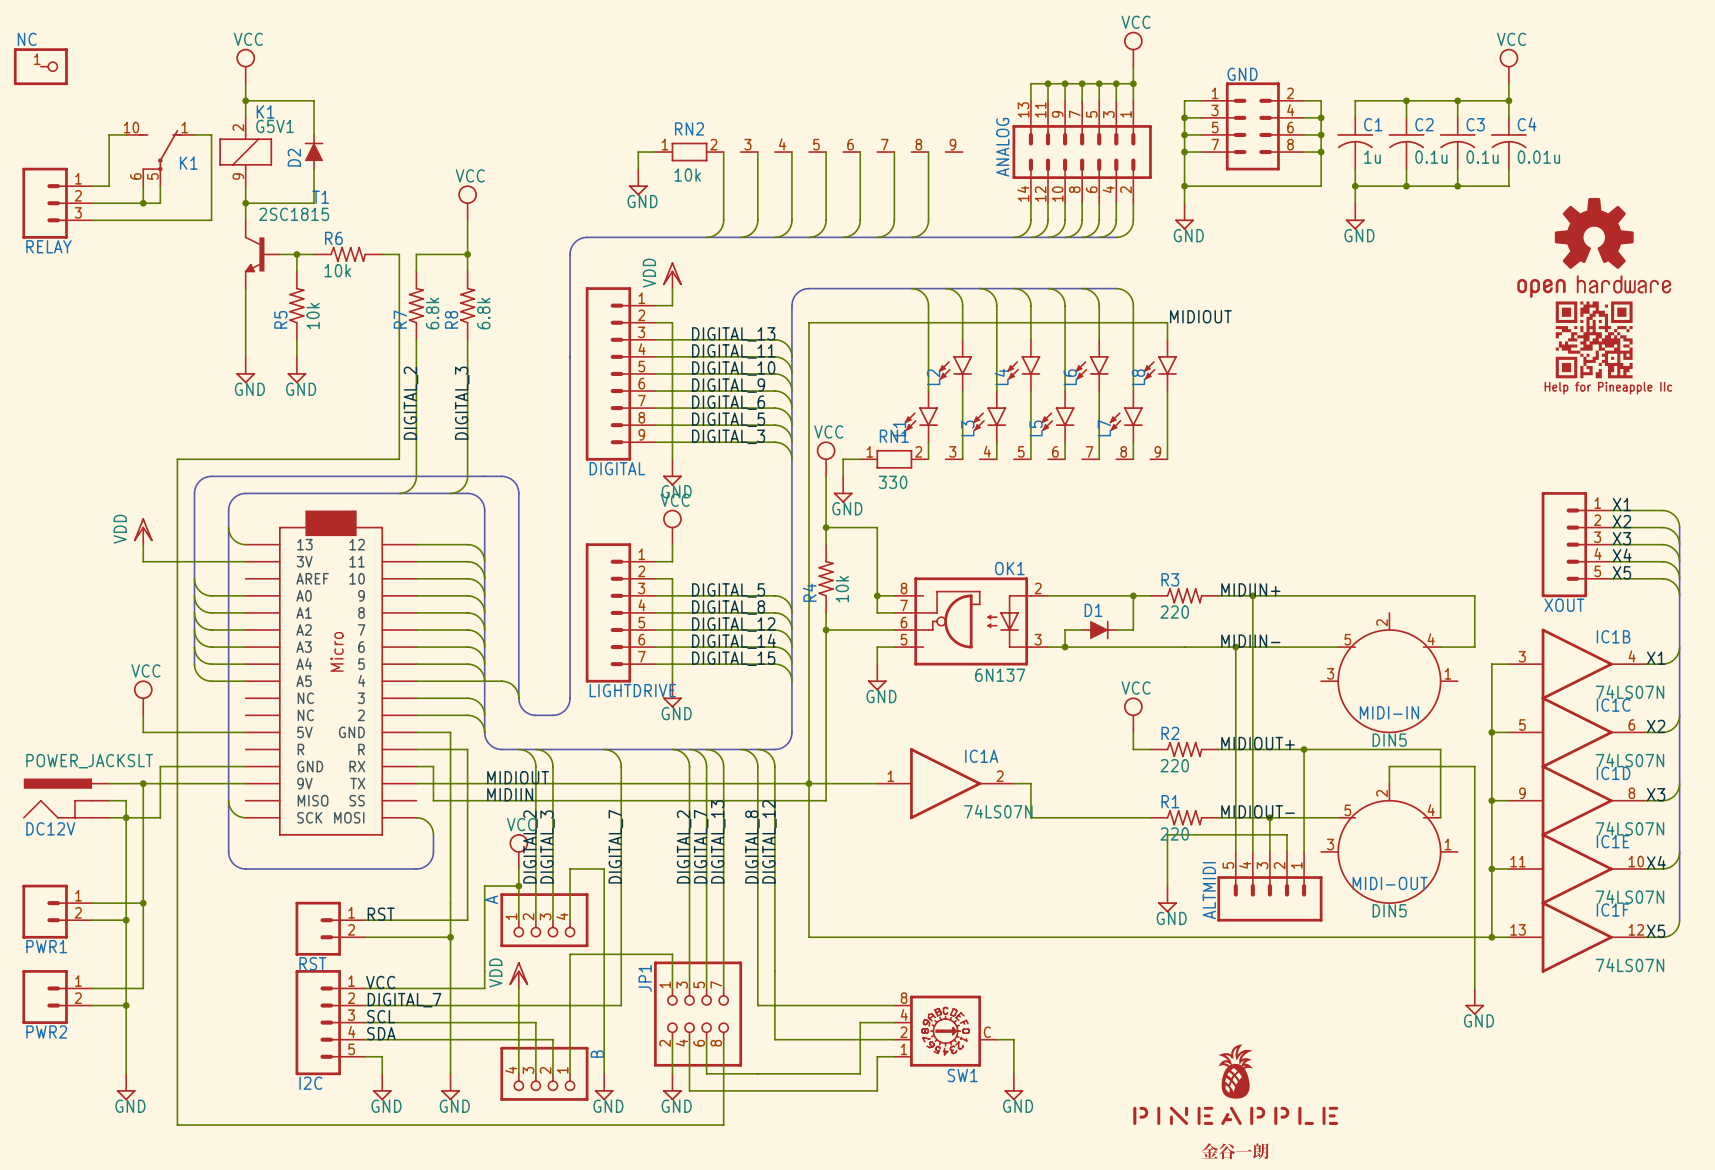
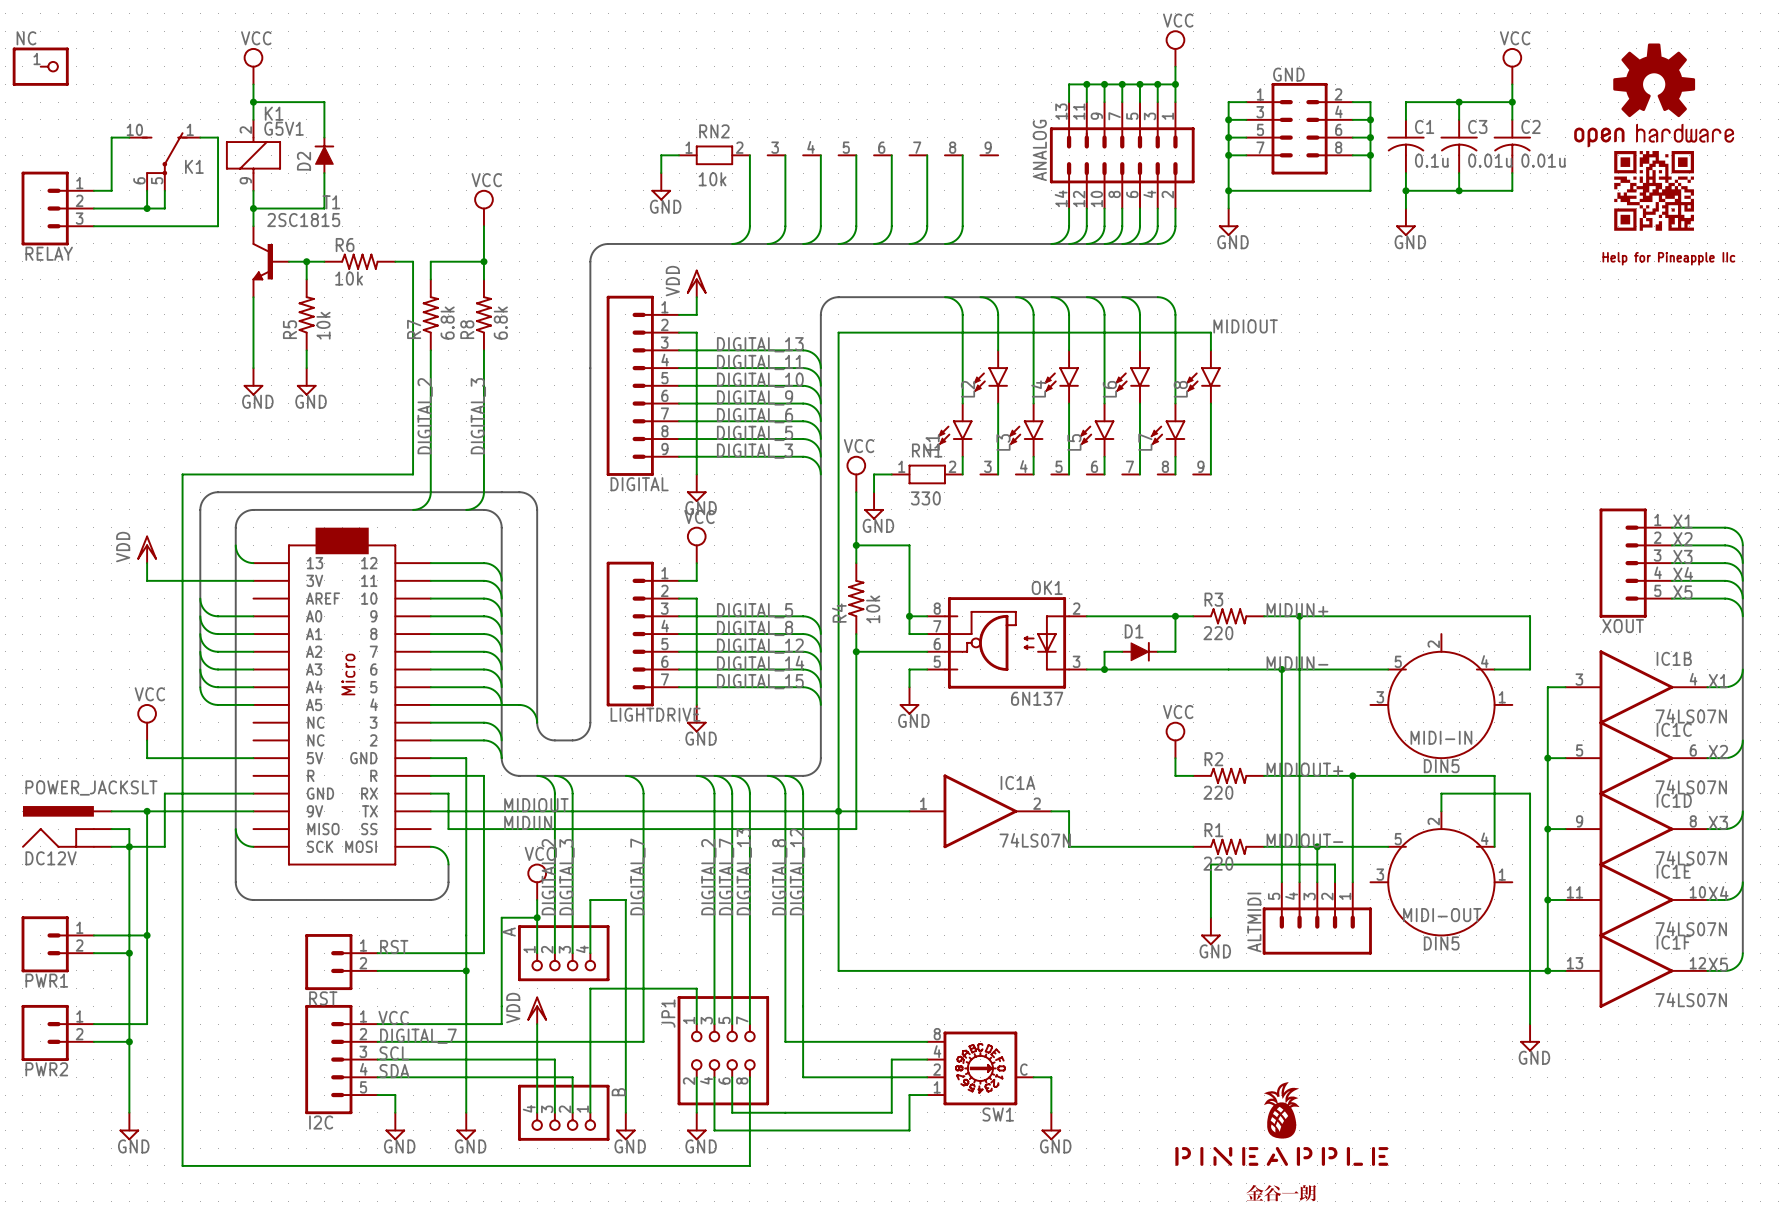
power symbol position: VCC (1508, 66) -> VCC (1512, 66)
wire: (1508, 83) (1508, 117) -> none
wire: (1457, 100) (1508, 100) -> (1512, 102) (1512, 84)
junction: (1508, 100) -> none
C2 name: C2 (1424, 124) -> C3 (1477, 126)
C3 name: C3 (1475, 124) -> C2 (1530, 126)
C4: 0.01u (1508, 143) -> none
C1 value: 1u (1372, 157) -> 0.1u (1431, 160)
C2 value: 0.1u (1431, 157) -> 0.01u (1490, 160)
C3 value: 0.1u (1482, 157) -> 0.01u (1543, 160)
wire: (1508, 169) (1508, 186) (1457, 186) -> none
junction: (1457, 186) -> none
part position: (1594, 247) -> (1654, 95)
part position: (1594, 339) -> (1654, 190)
part position: (1608, 388) -> (1668, 258)

